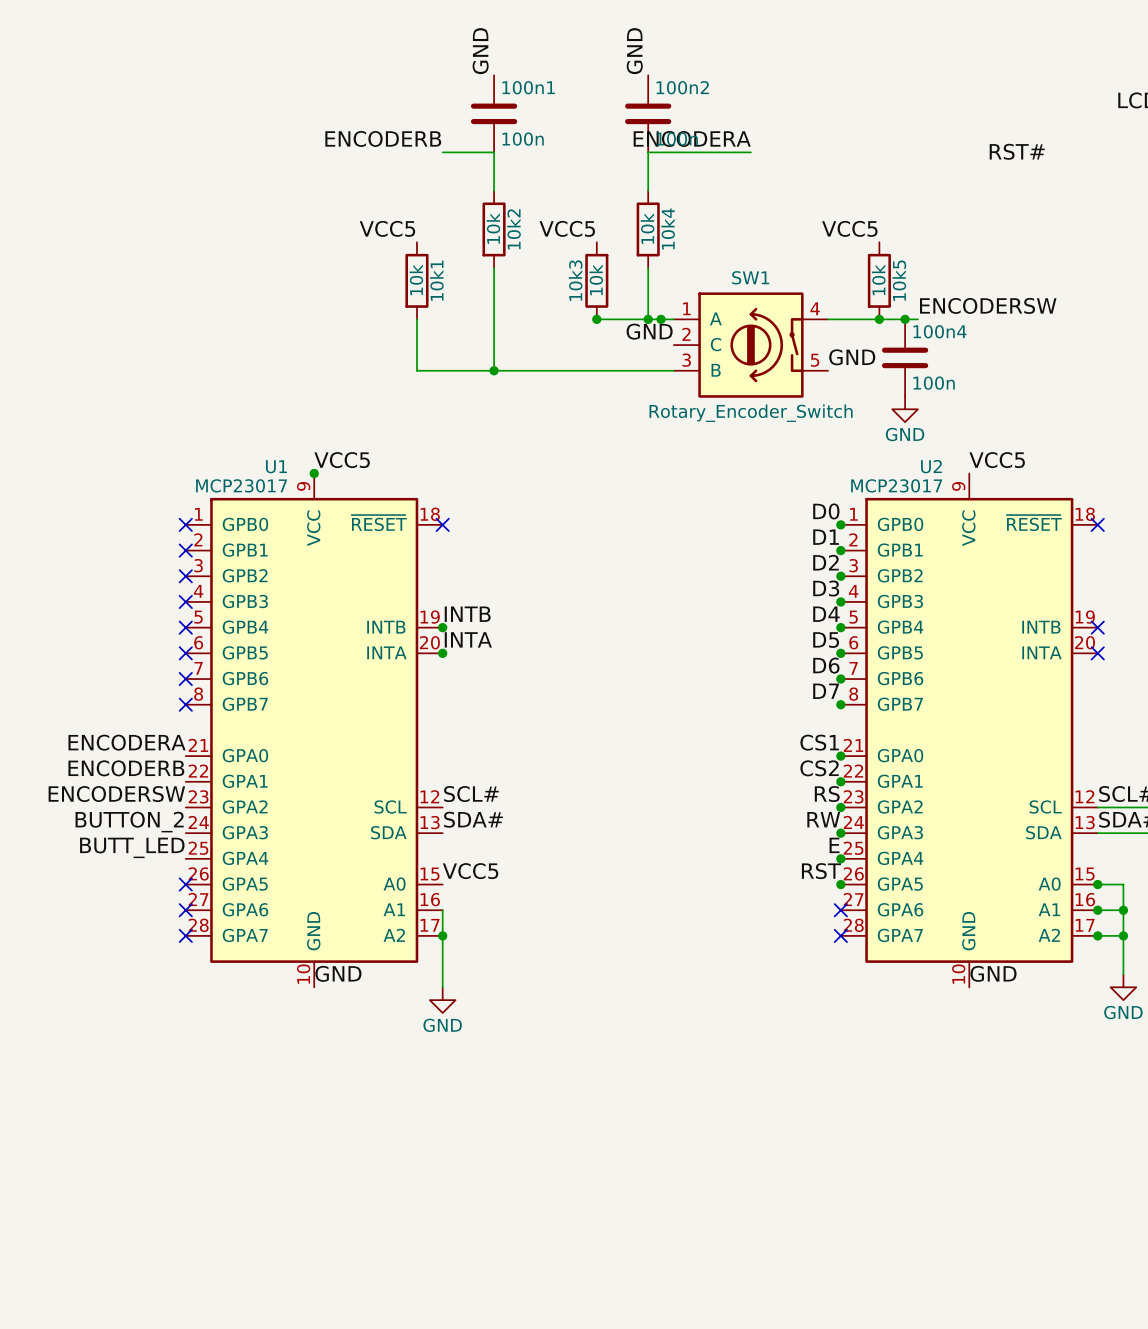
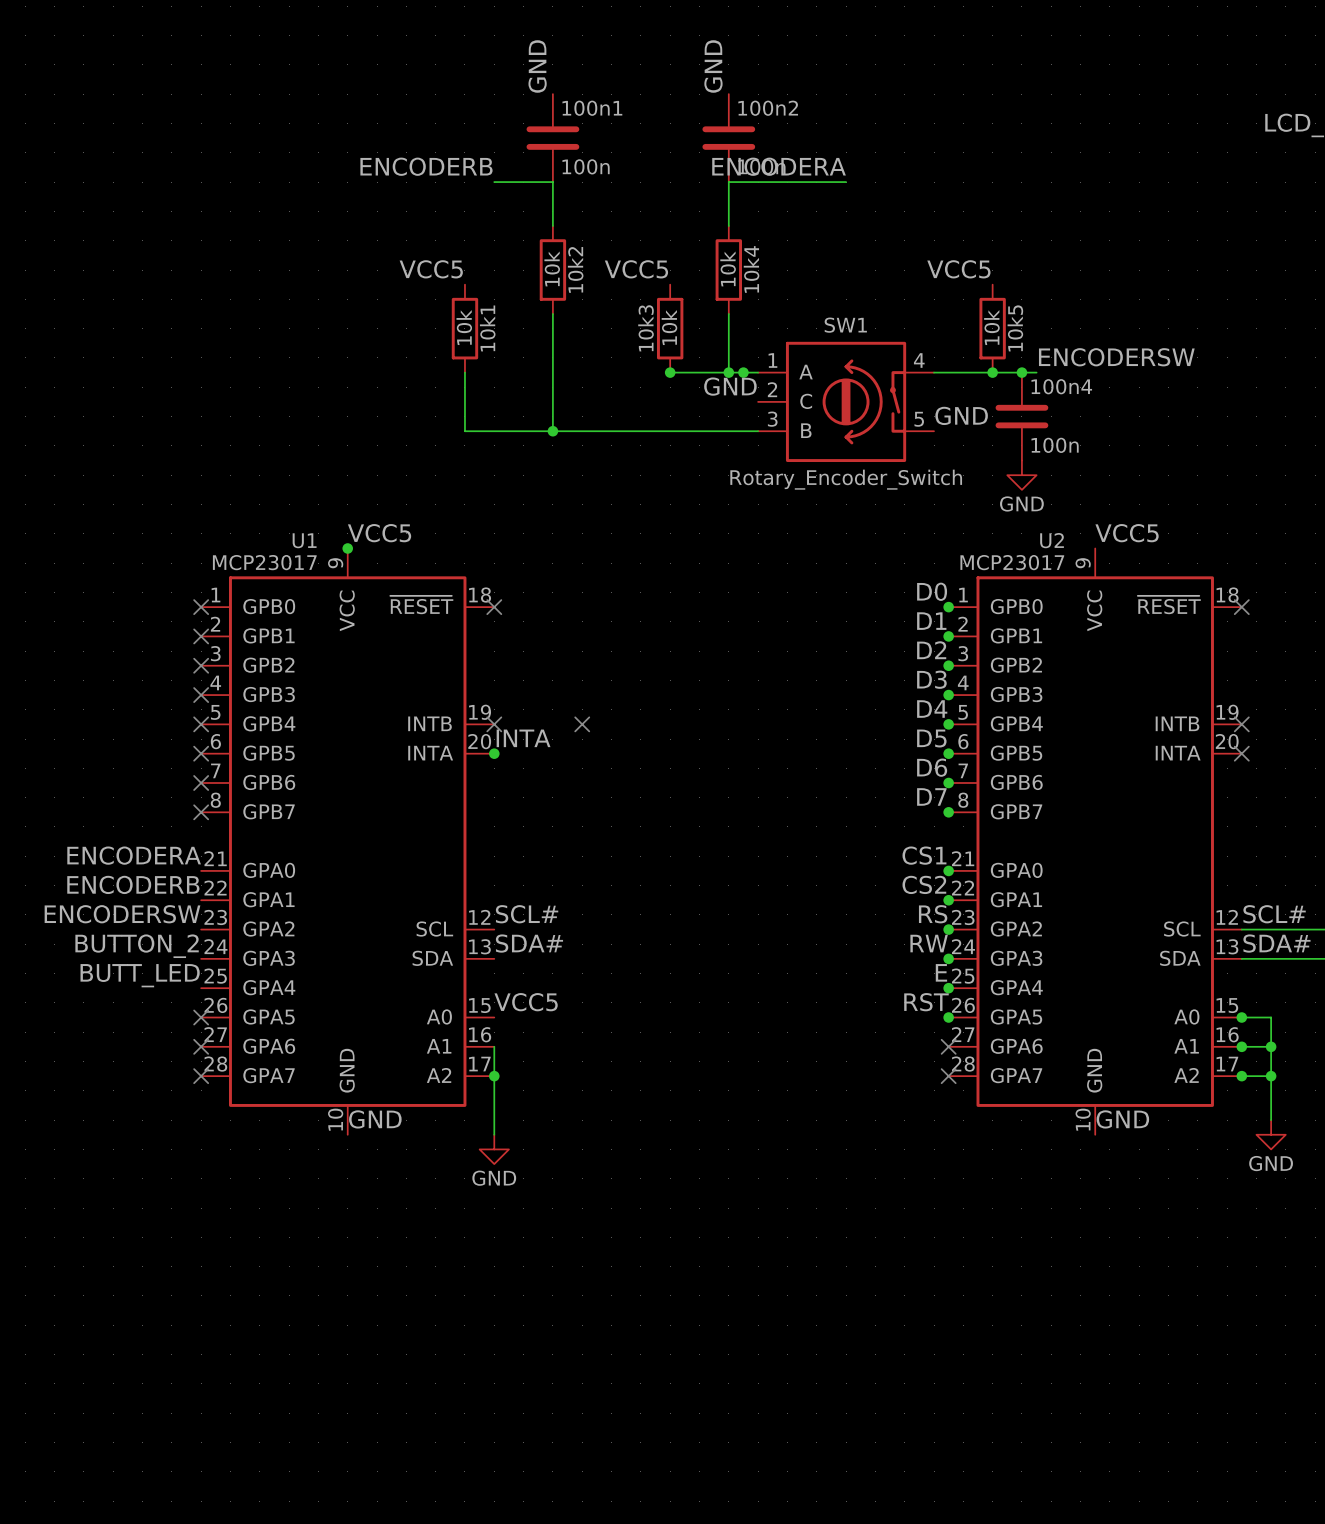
label: RST# (1017, 151) -> none
label: INTB (467, 614) -> none
junction: (442, 627) -> none
no-connect mark: none -> (494, 724)
no-connect mark: none -> (582, 724)

